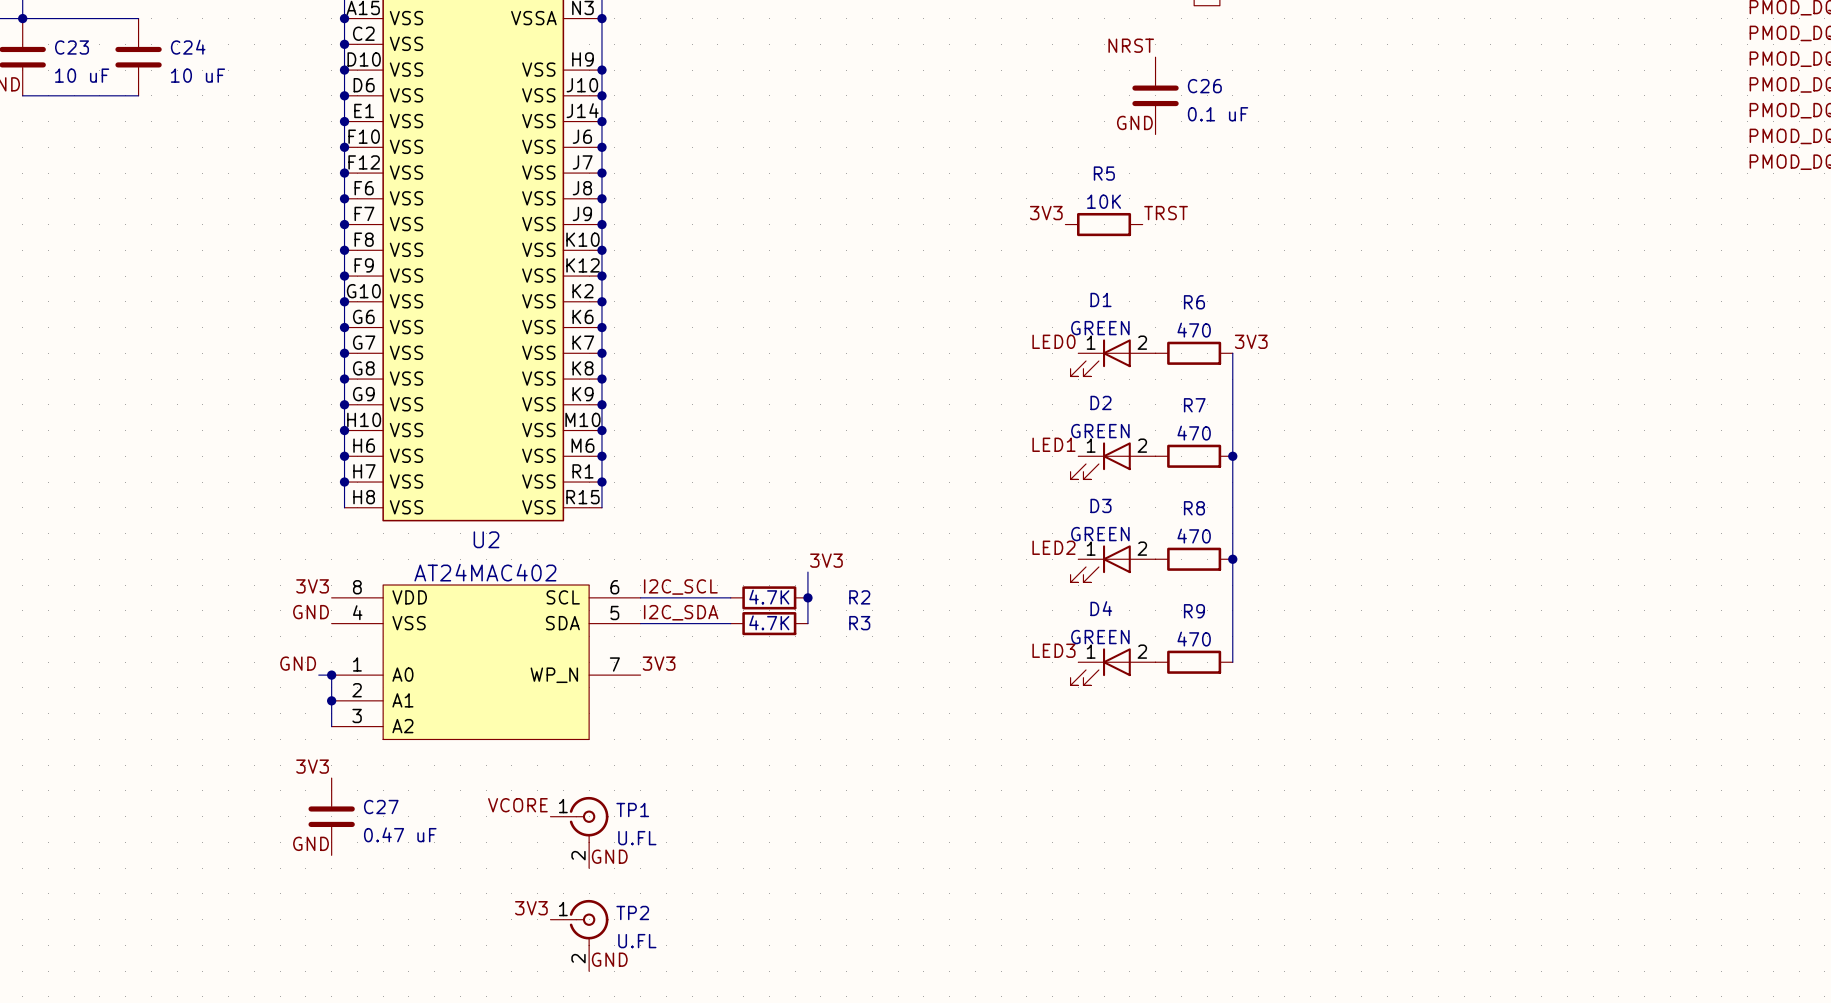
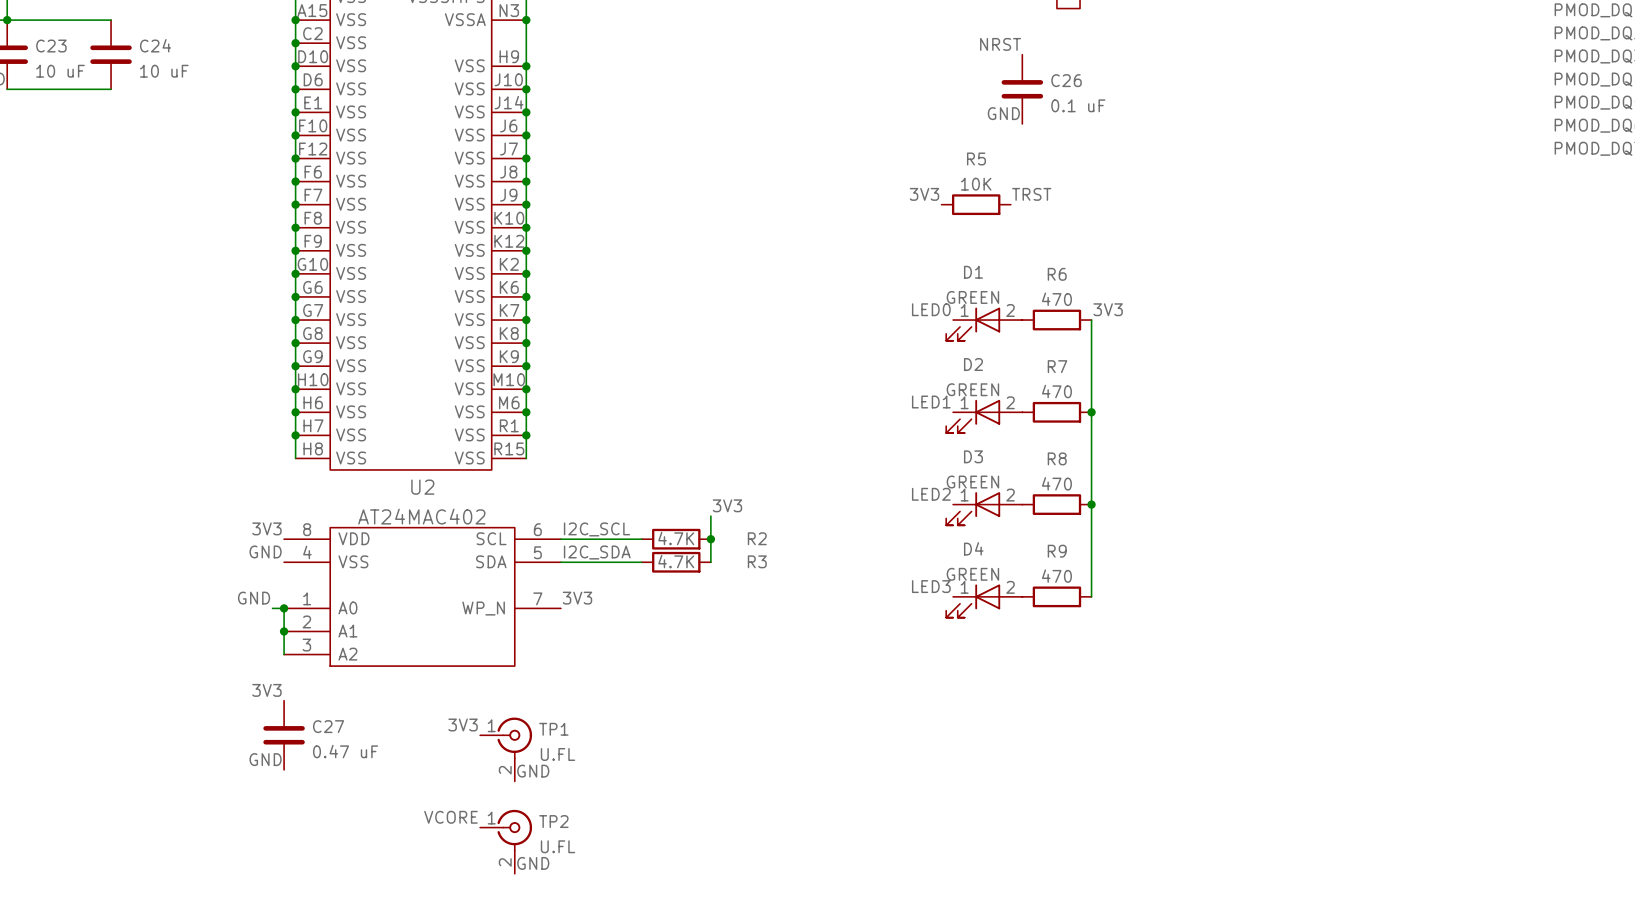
label: VCORE (517, 805) -> 3V3 (463, 725)
label: 3V3 (531, 908) -> VCORE (450, 817)

